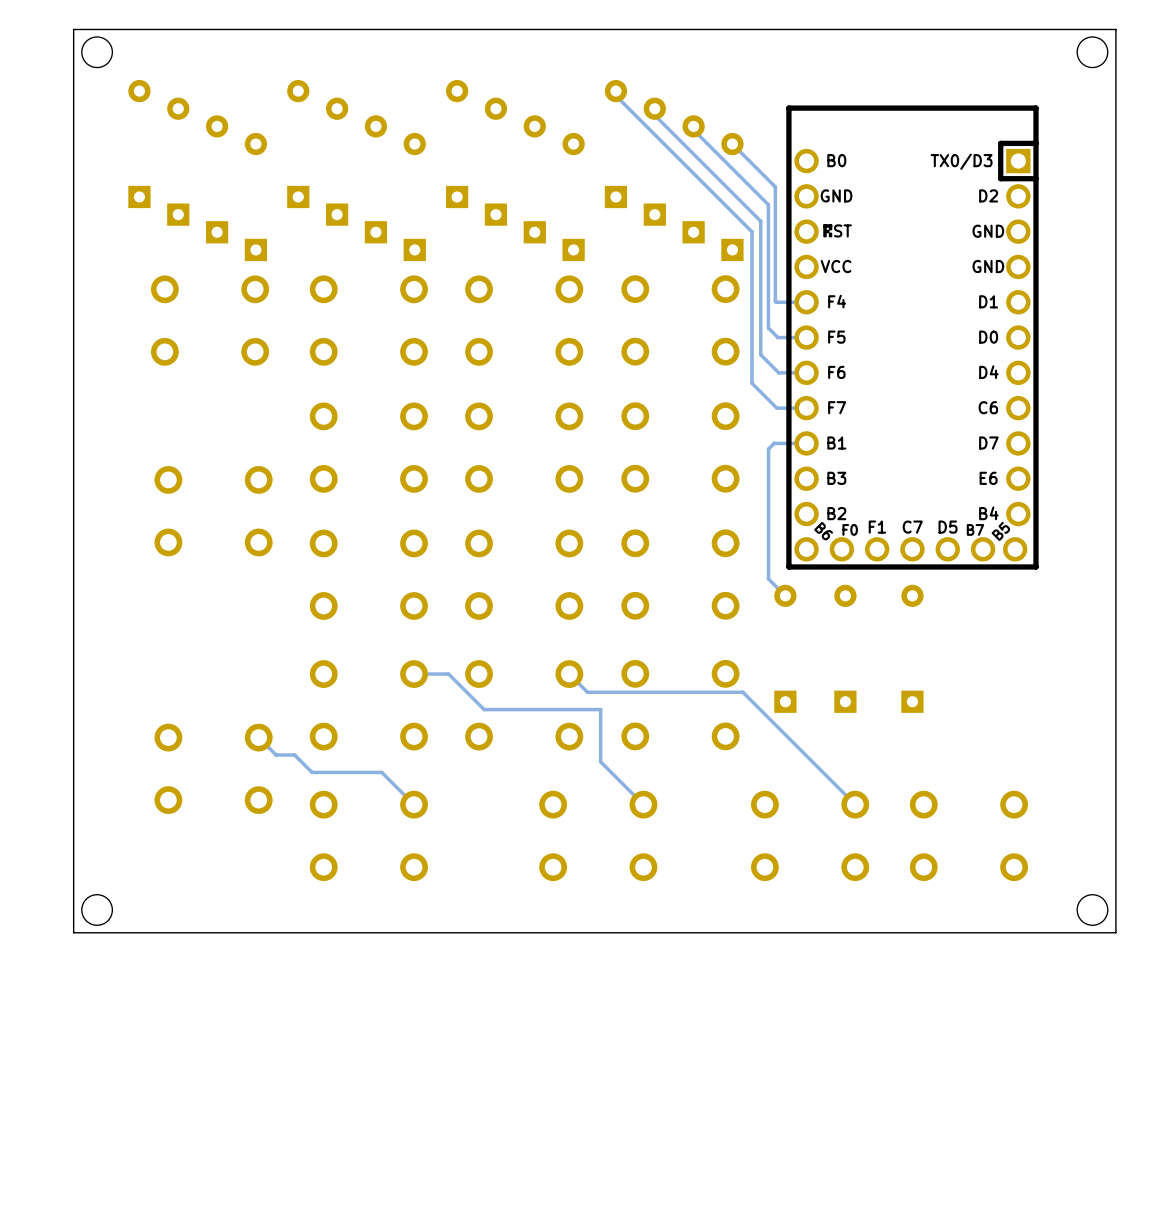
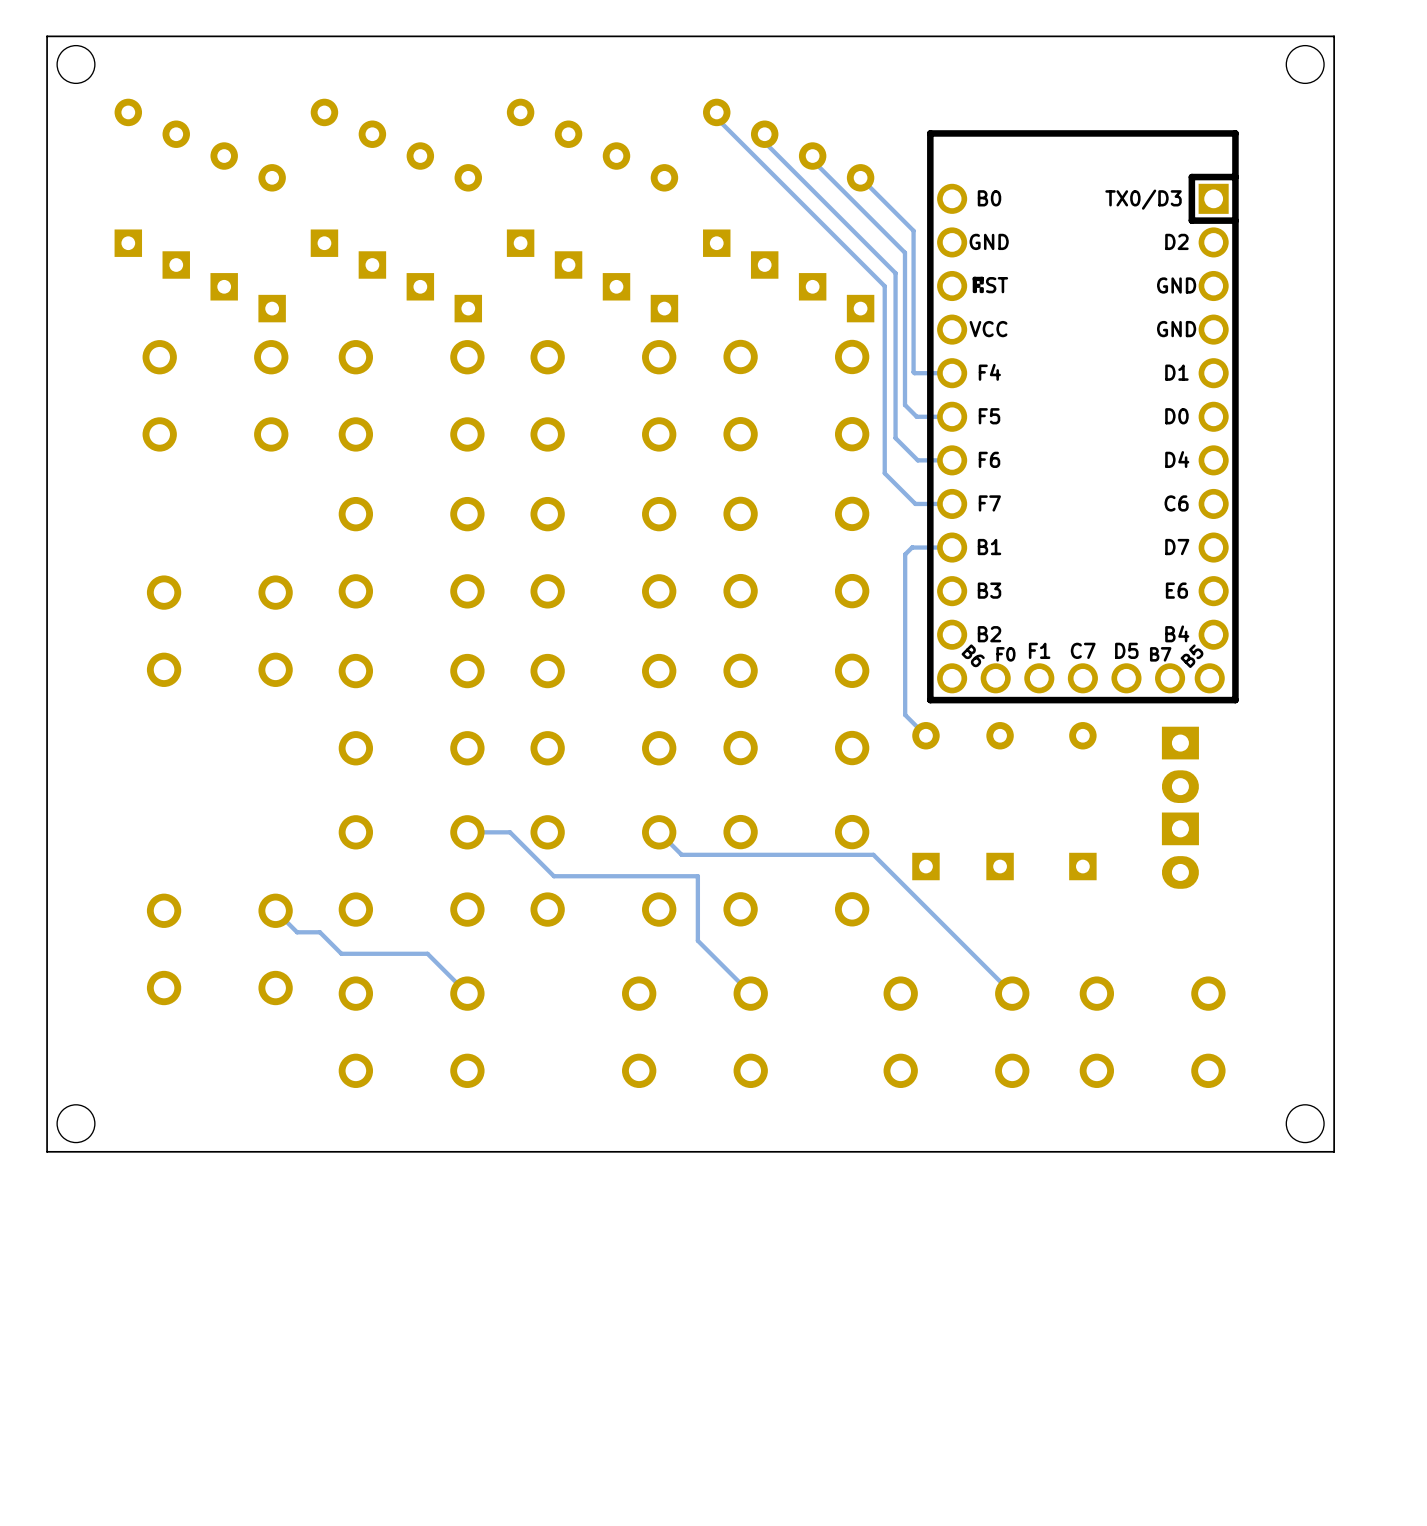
part: none -> (1180, 764)
part: none -> (1180, 850)

